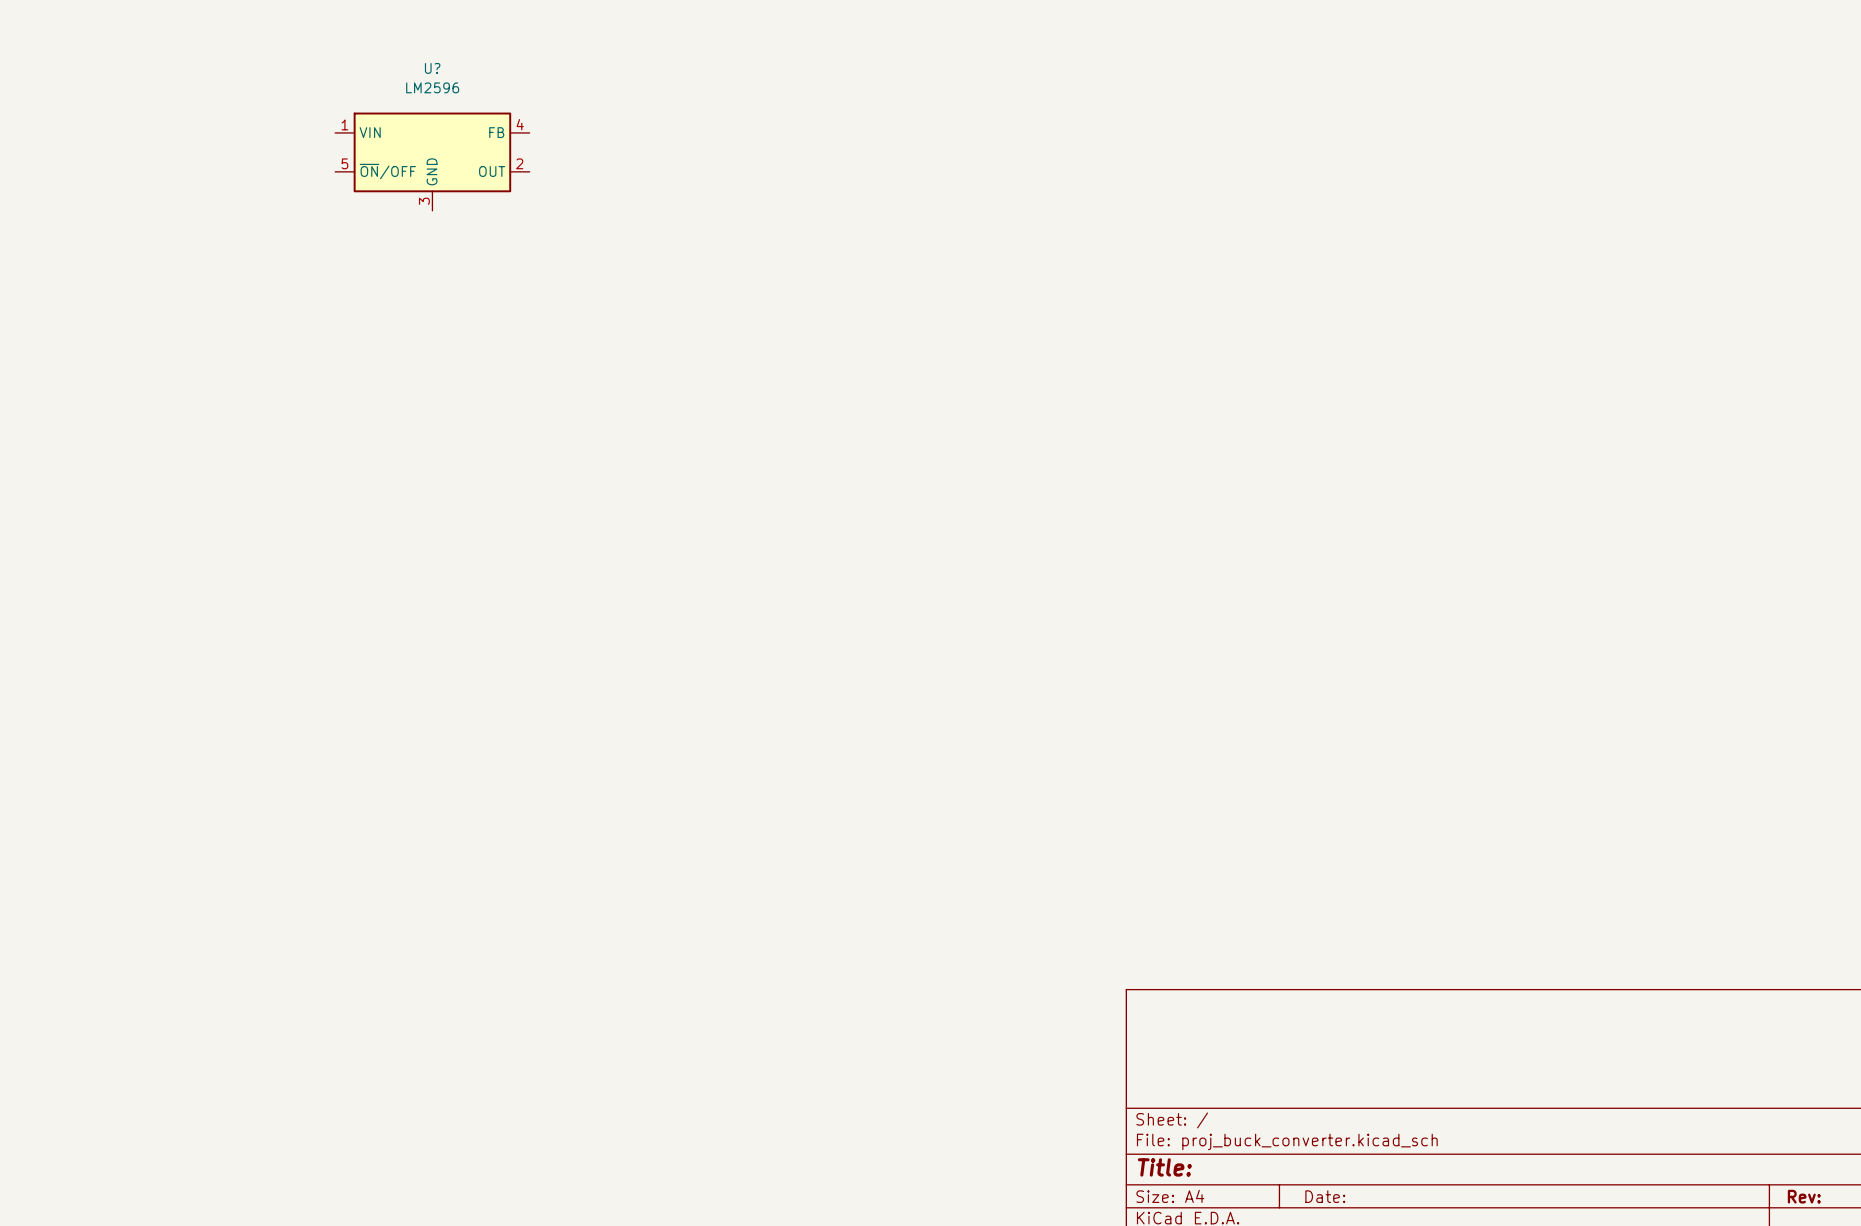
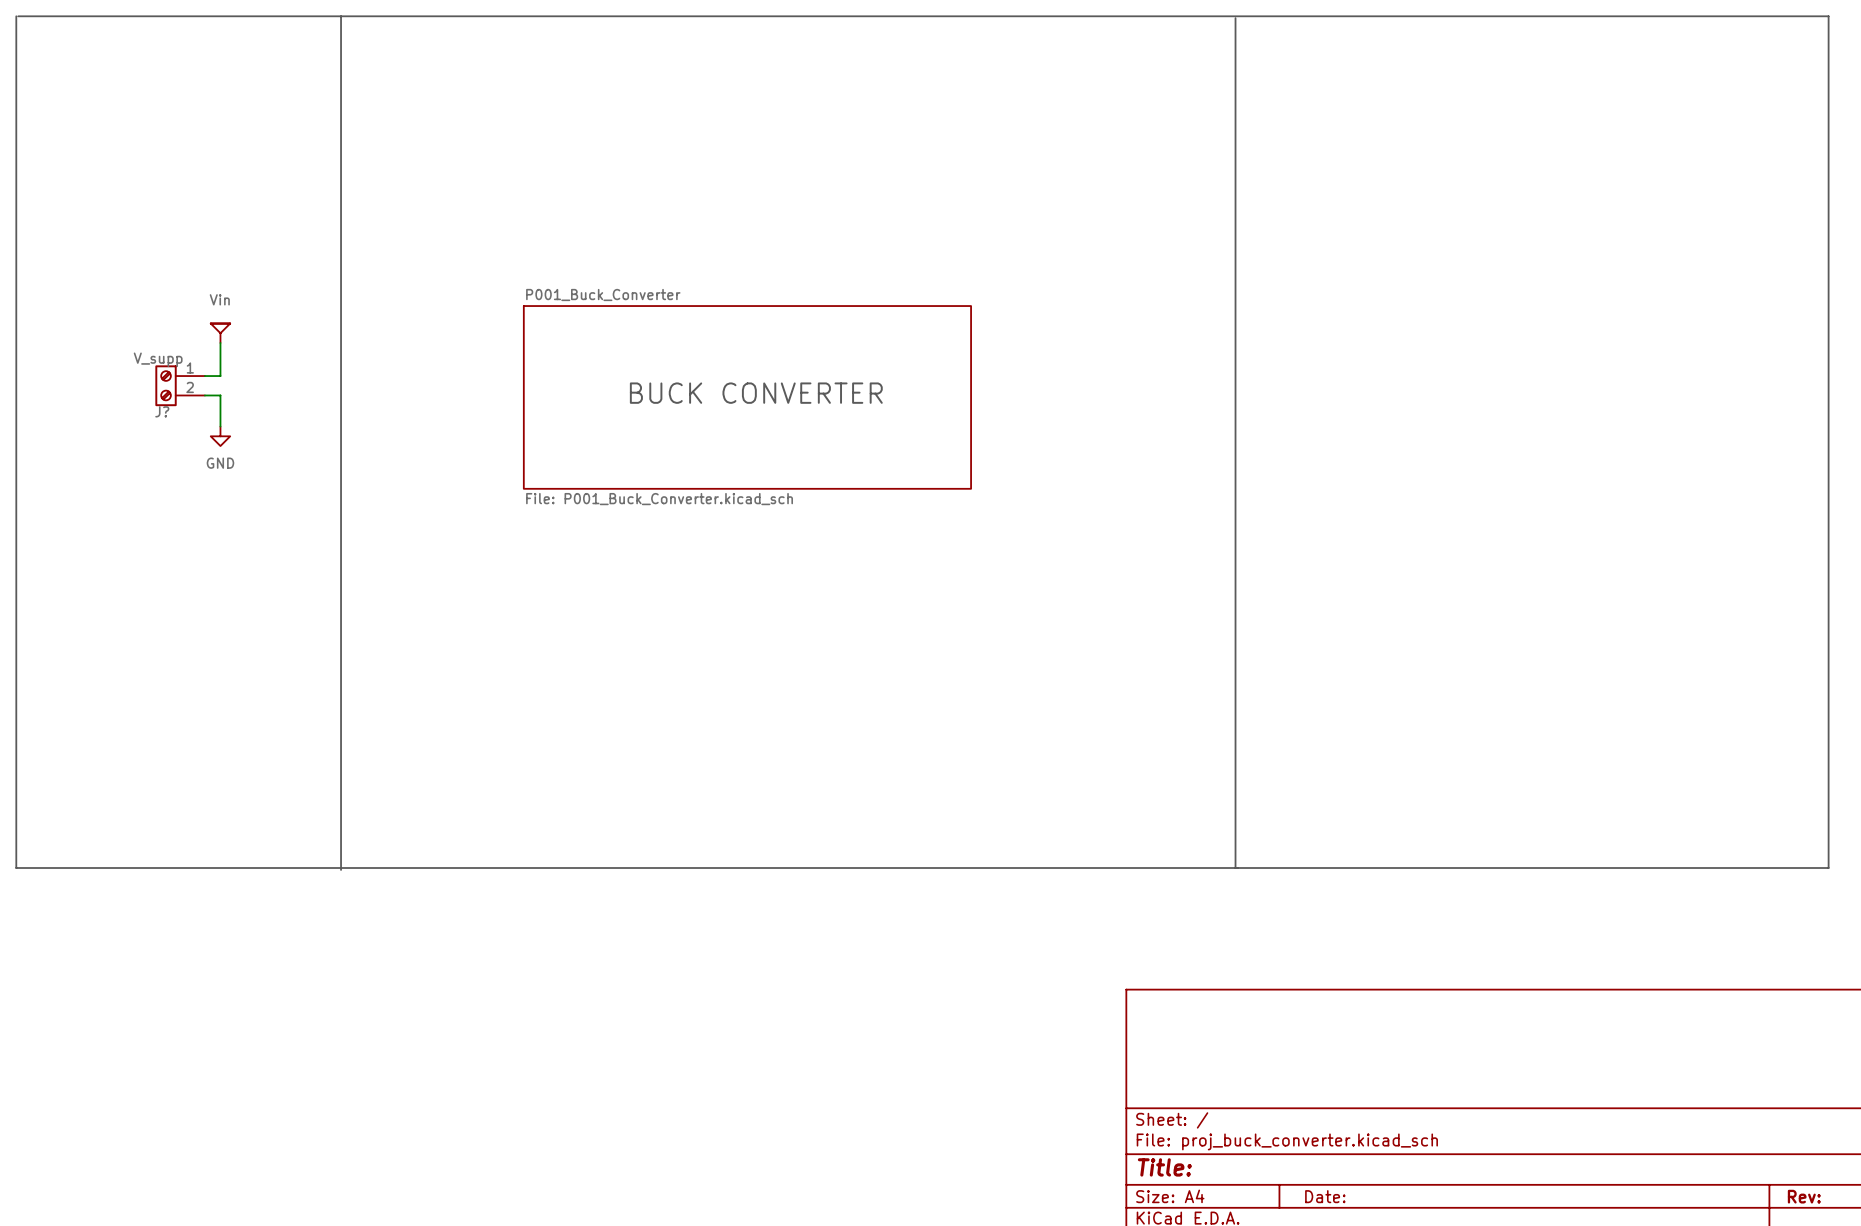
line: none -> (16, 16) (16, 868) (1828, 868) (1828, 16) (18, 16)
line: none -> (341, 16) (341, 869)
line: none -> (1235, 18) (1235, 868)
U?: LM2596 (432, 161) -> none
power symbol: none -> Vin (220, 333)
wire: none -> (220, 342) (220, 376) (204, 376)
J?: none -> V_supp (180, 385)
text: none -> BUCK CONVERTER (756, 393)
wire: none -> (204, 395) (220, 395) (220, 426)
sheet P001_Buck_Converter: none -> File: P001_Buck_Converter.kicad_sch (747, 397)
power symbol: none -> GND (220, 436)

